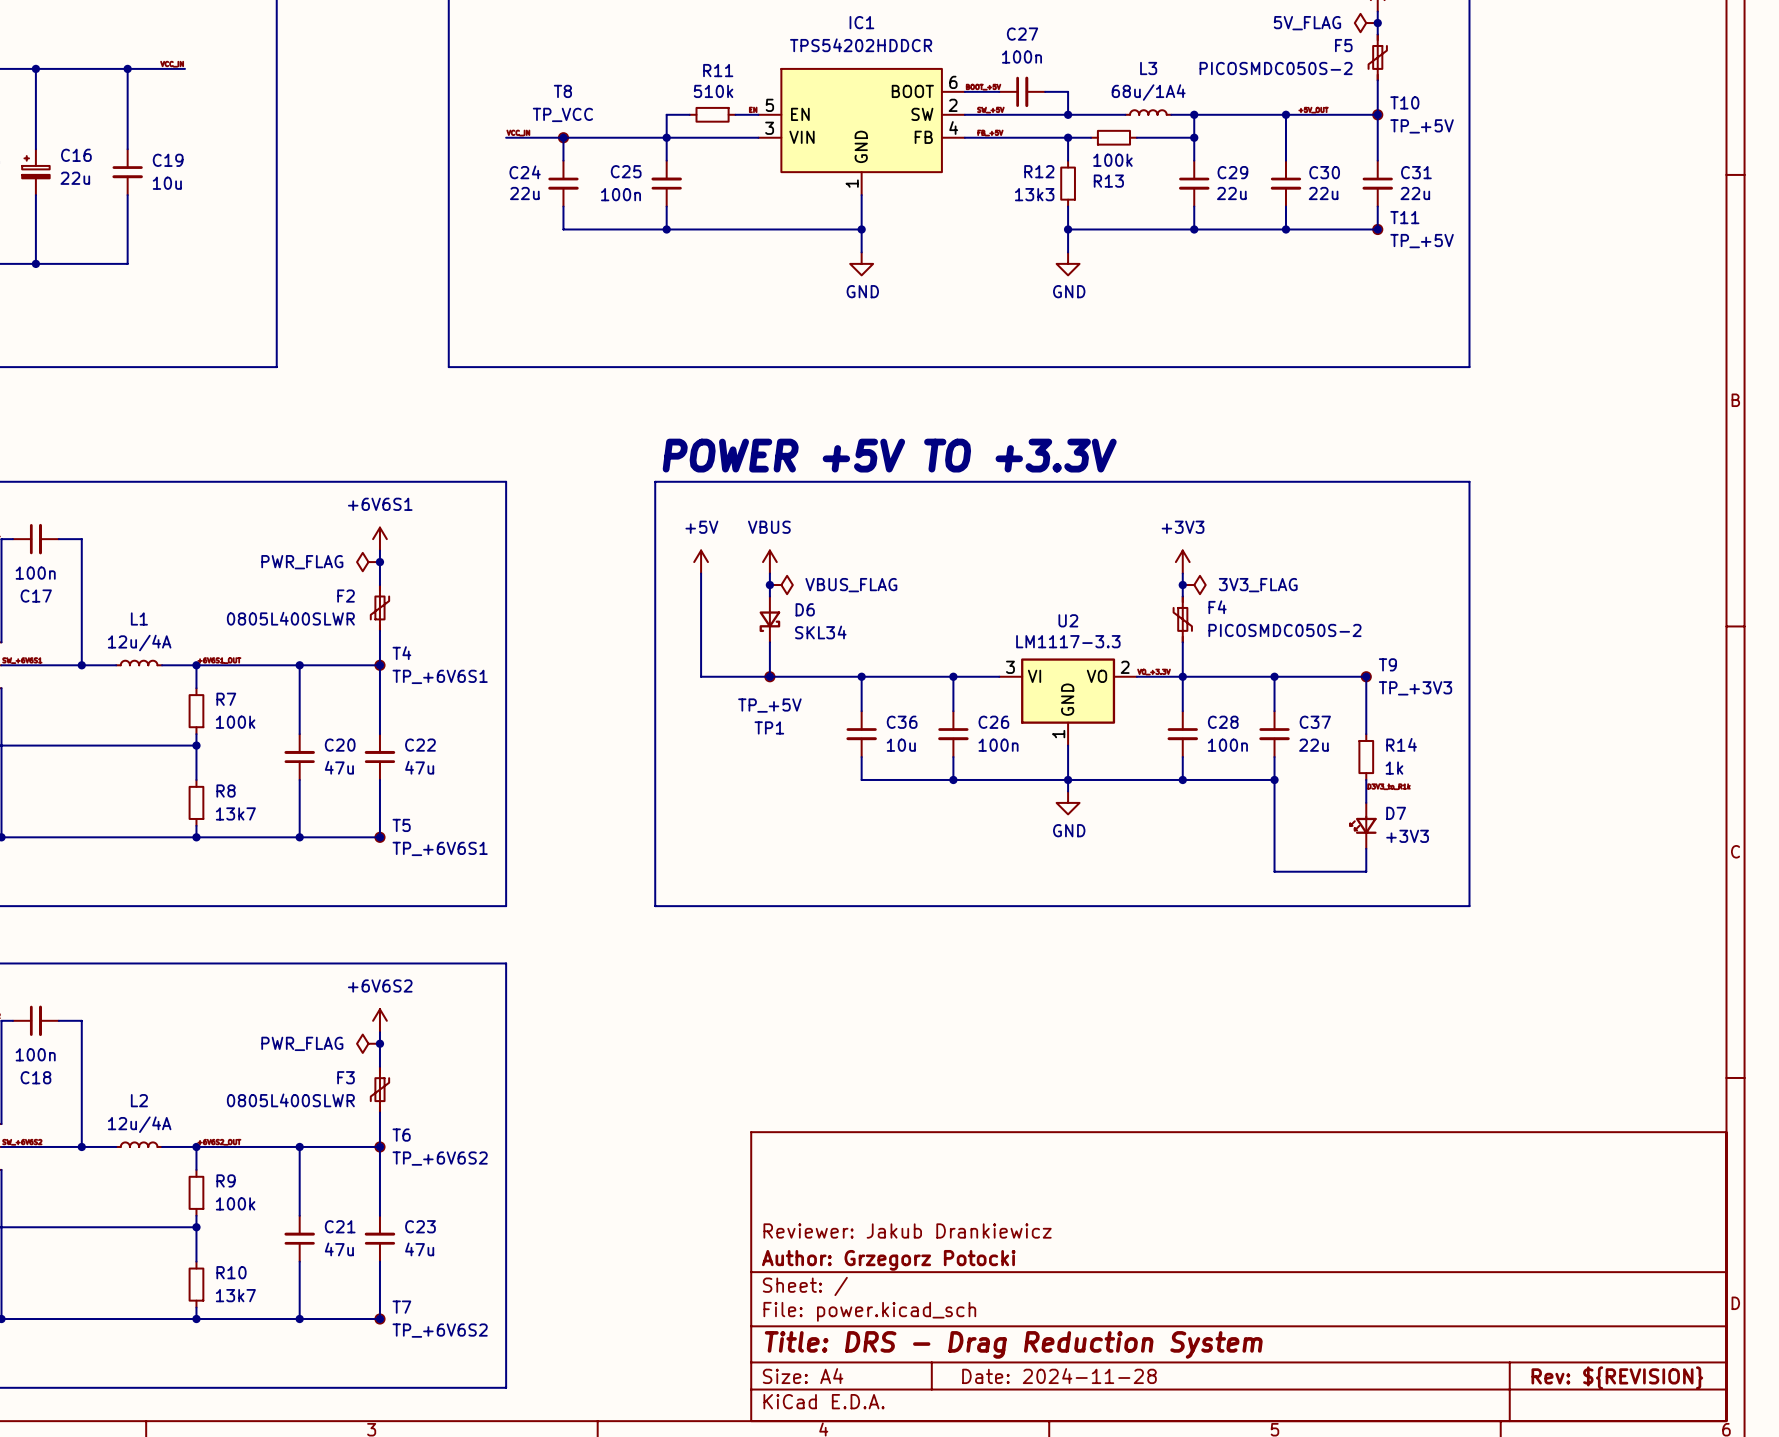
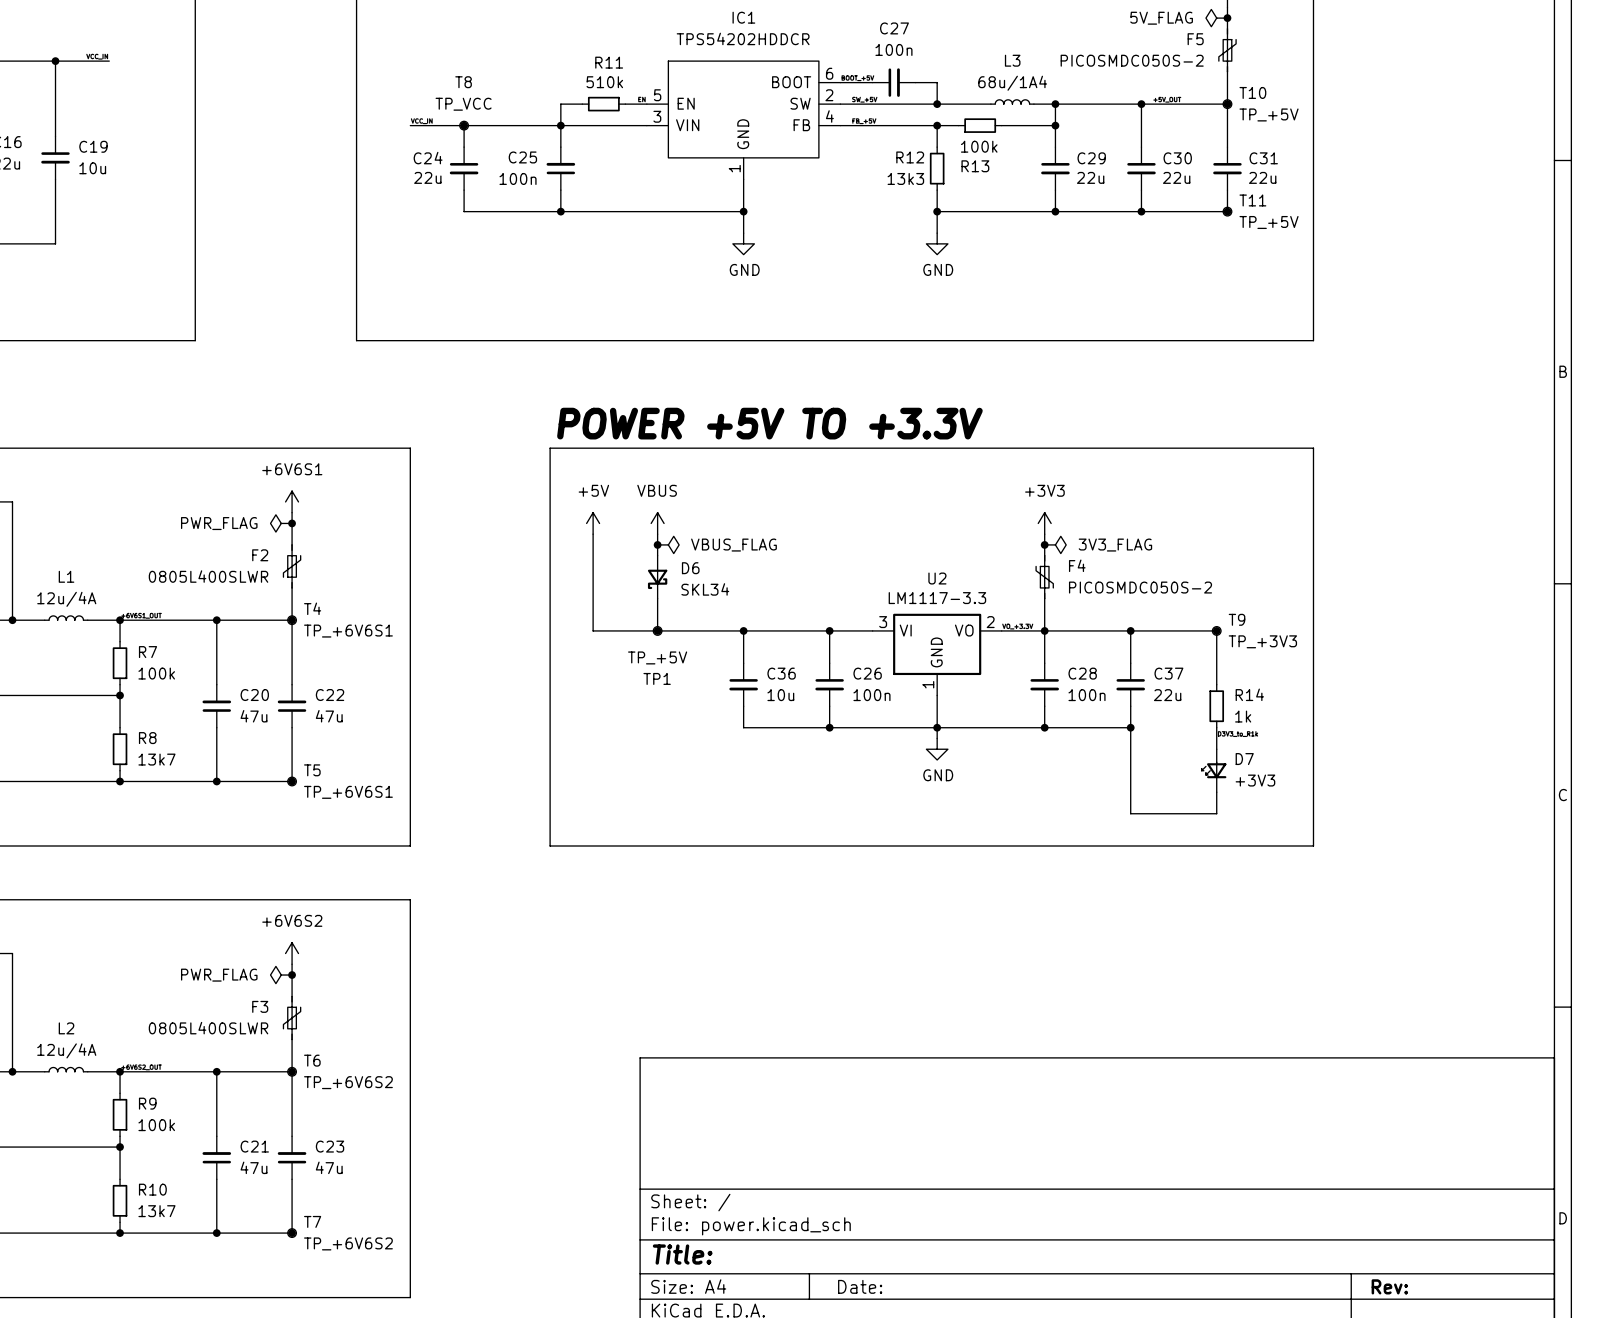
title block: Reviewer: Jakub Drankiewicz (907, 1230) -> none
title block: Author: Grzegorz Potocki (888, 1260) -> none
title block: Title: DRS - Drag Reduction System (1013, 1344) -> Title: (682, 1254)
title block: Date: 2024-11-28 (1059, 1376) -> Date: (860, 1286)
title block: Rev: ${REVISION} (1617, 1377) -> Rev: (1389, 1286)

